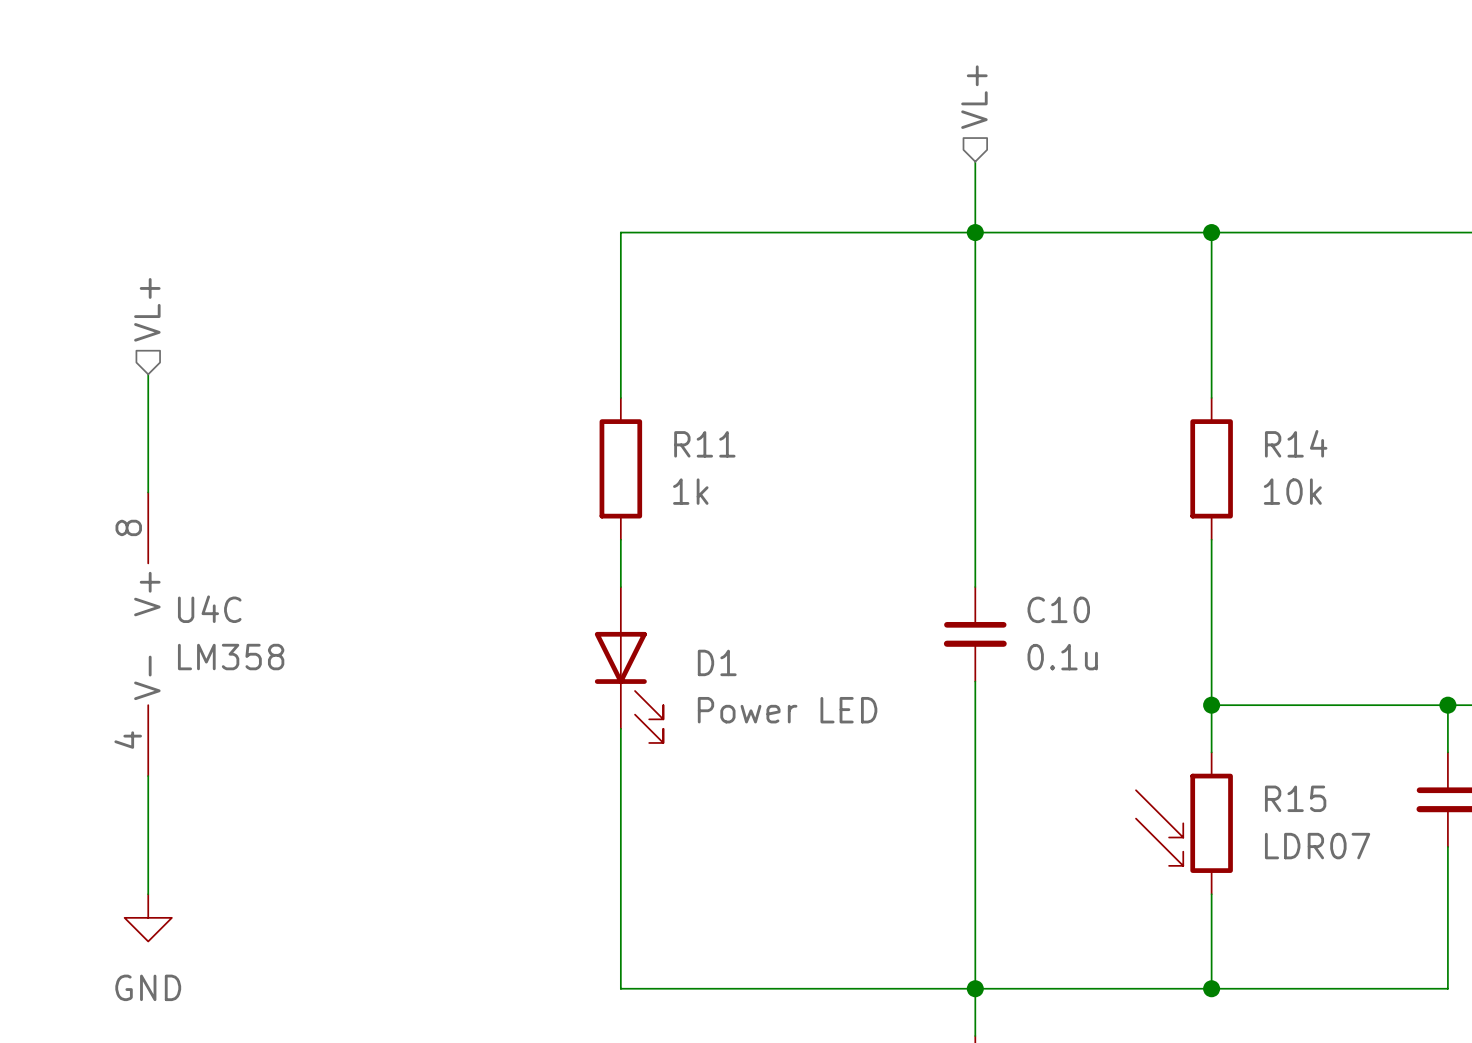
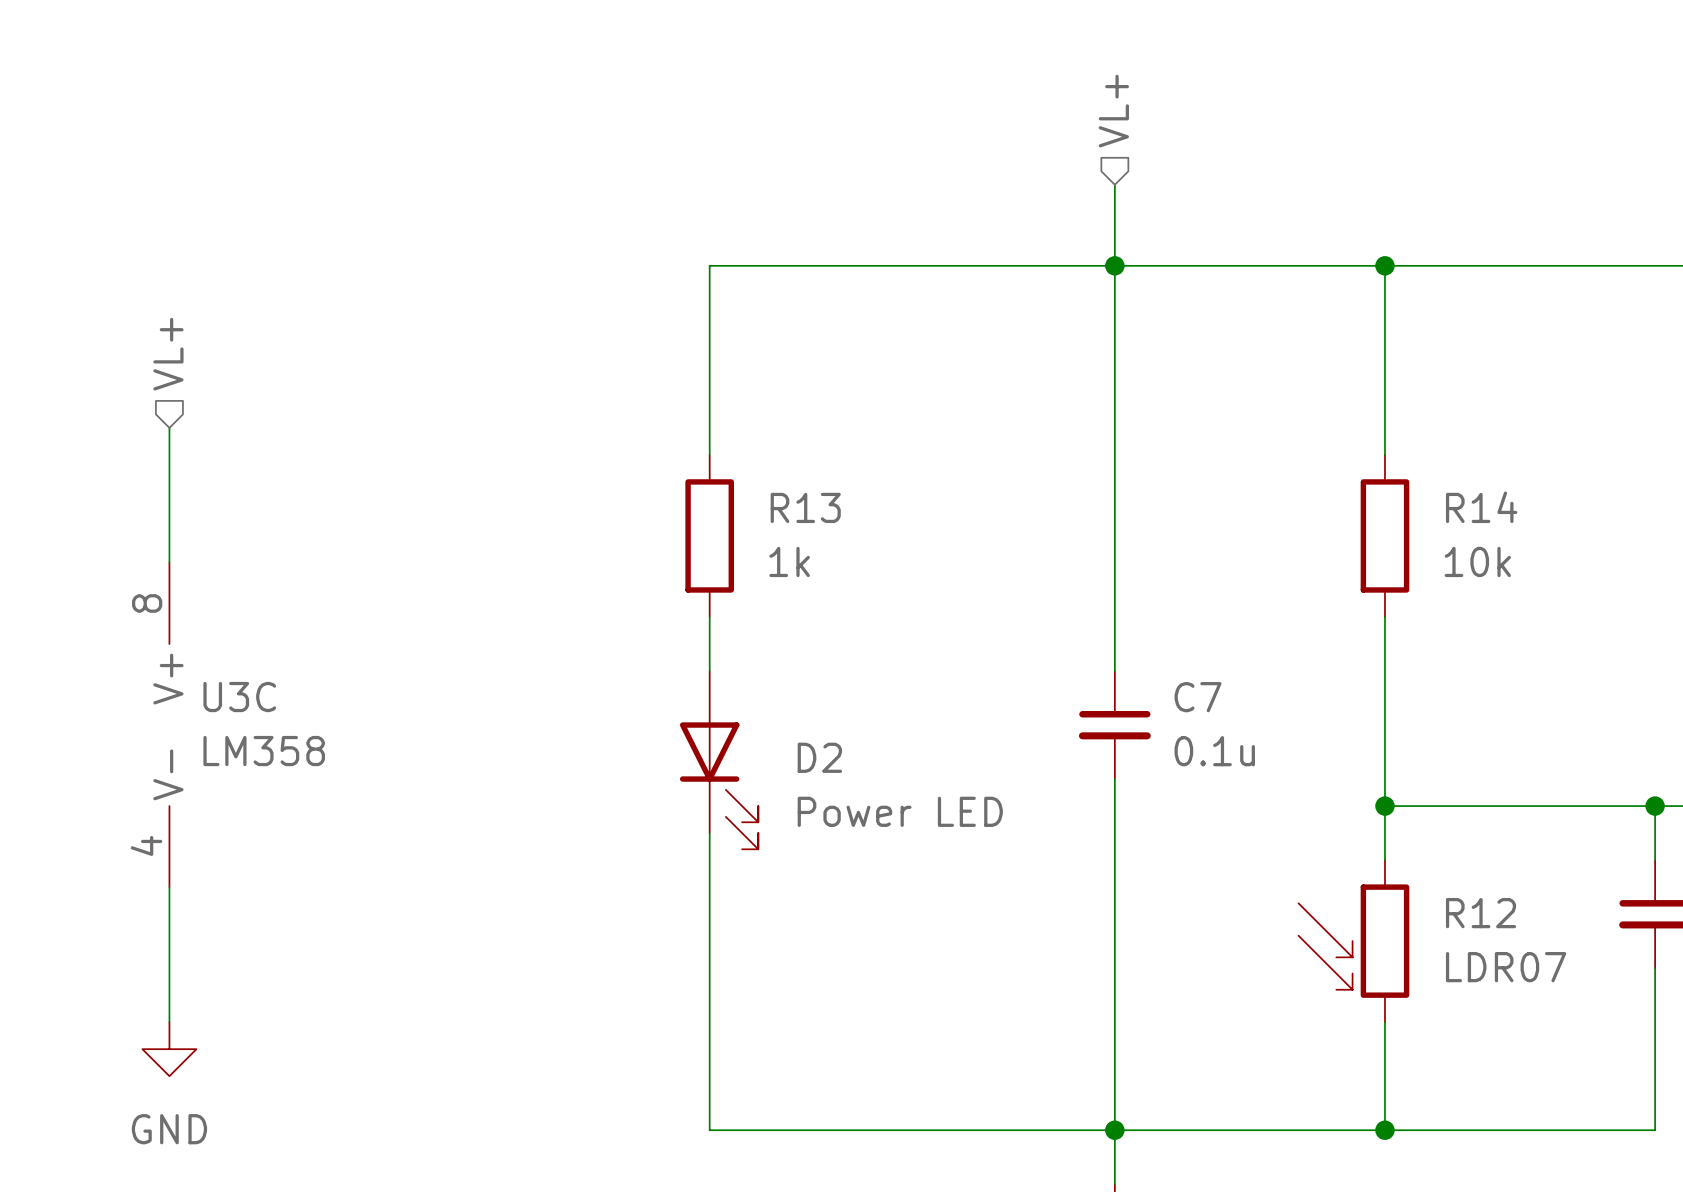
R11 name: R11 (704, 444) -> R13 (805, 507)
U4C name: U4C (209, 609) -> U3C (239, 697)
C10 name: C10 (1058, 609) -> C7 (1198, 697)
D1 name: D1 (717, 662) -> D2 (819, 757)
R15 name: R15 (1295, 798) -> R12 (1481, 913)

